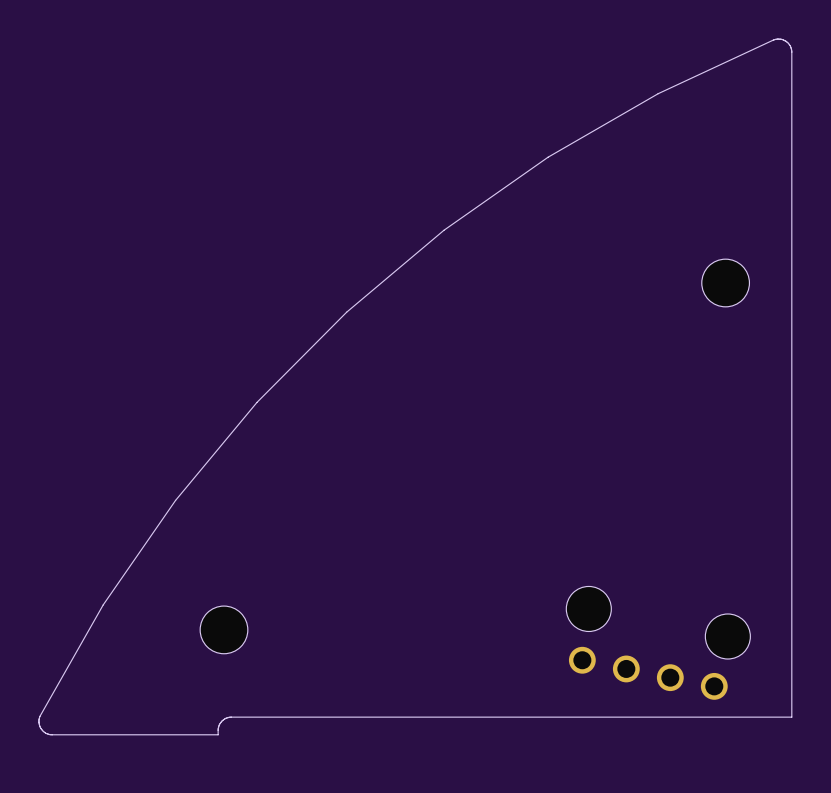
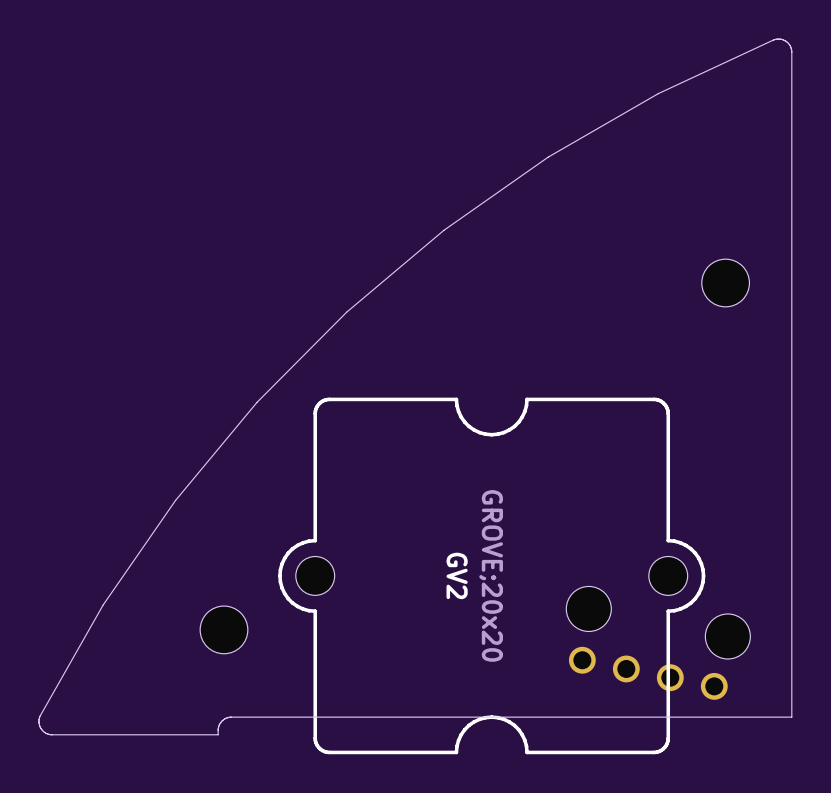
GV2: none -> GROVE;20x20 (491, 575)

